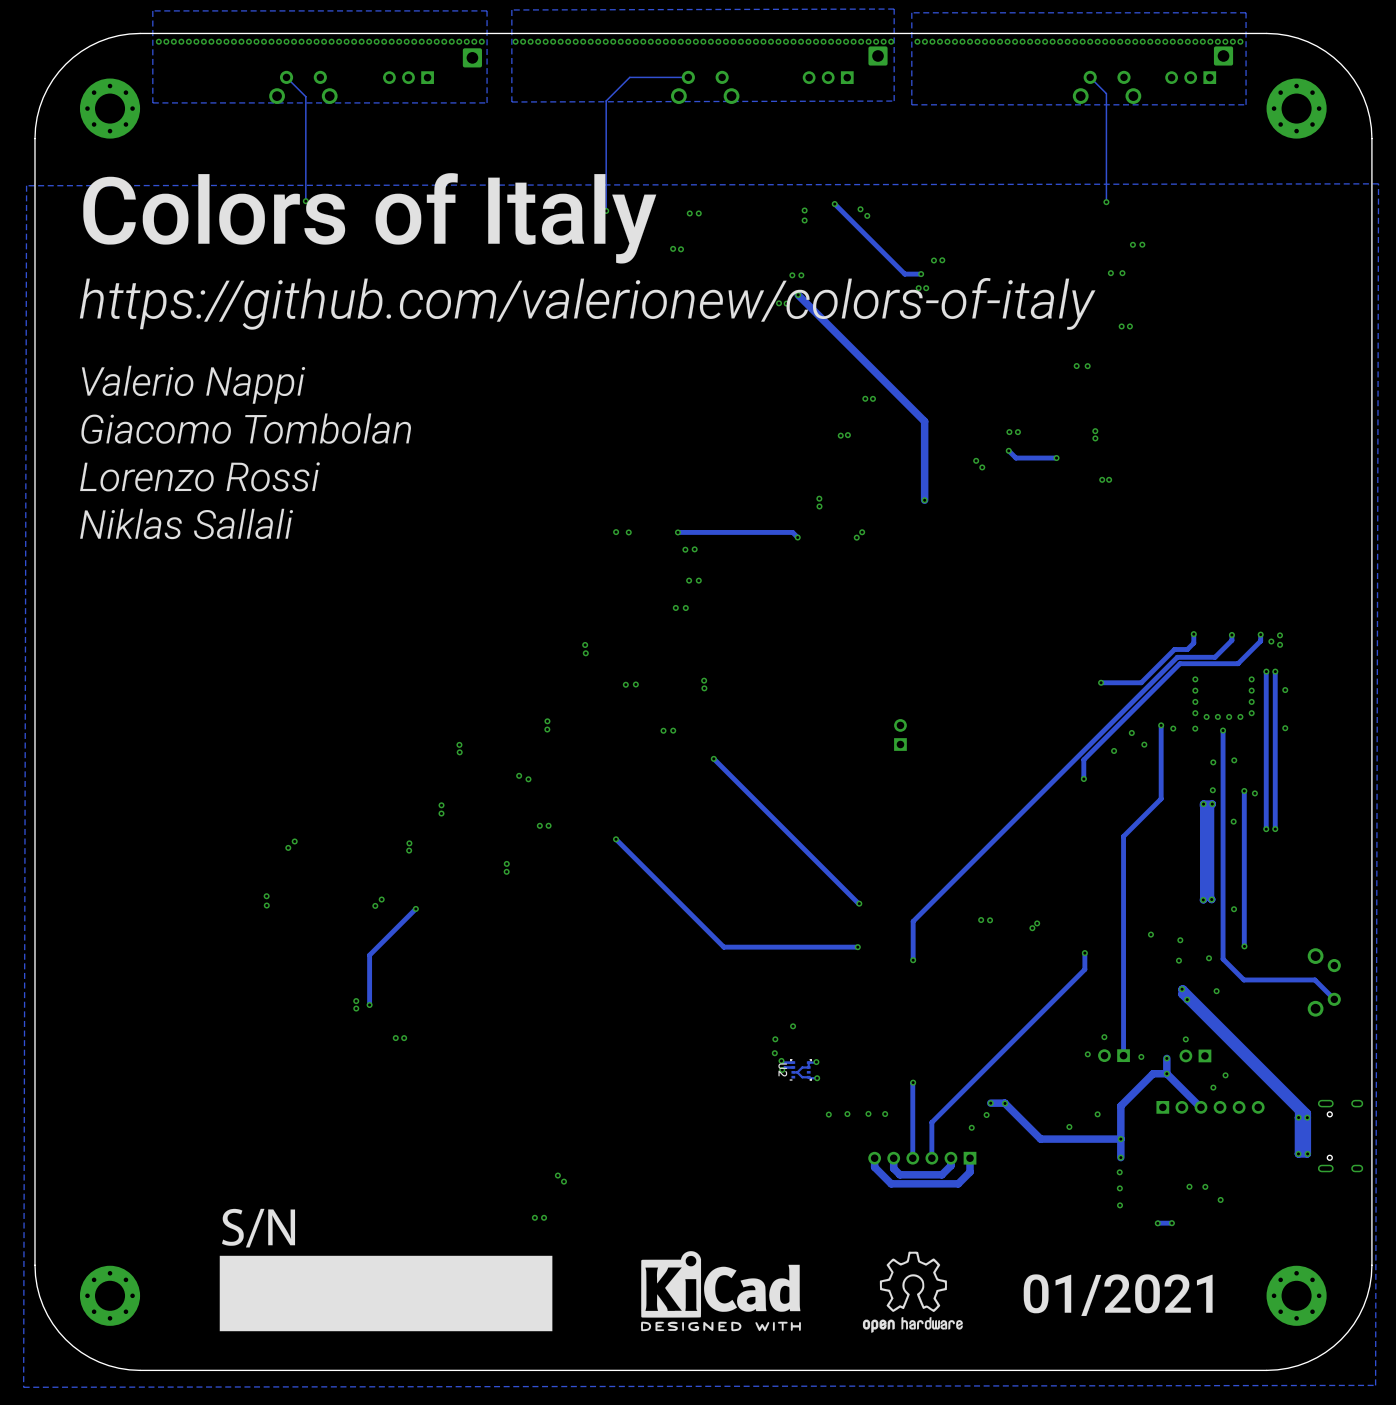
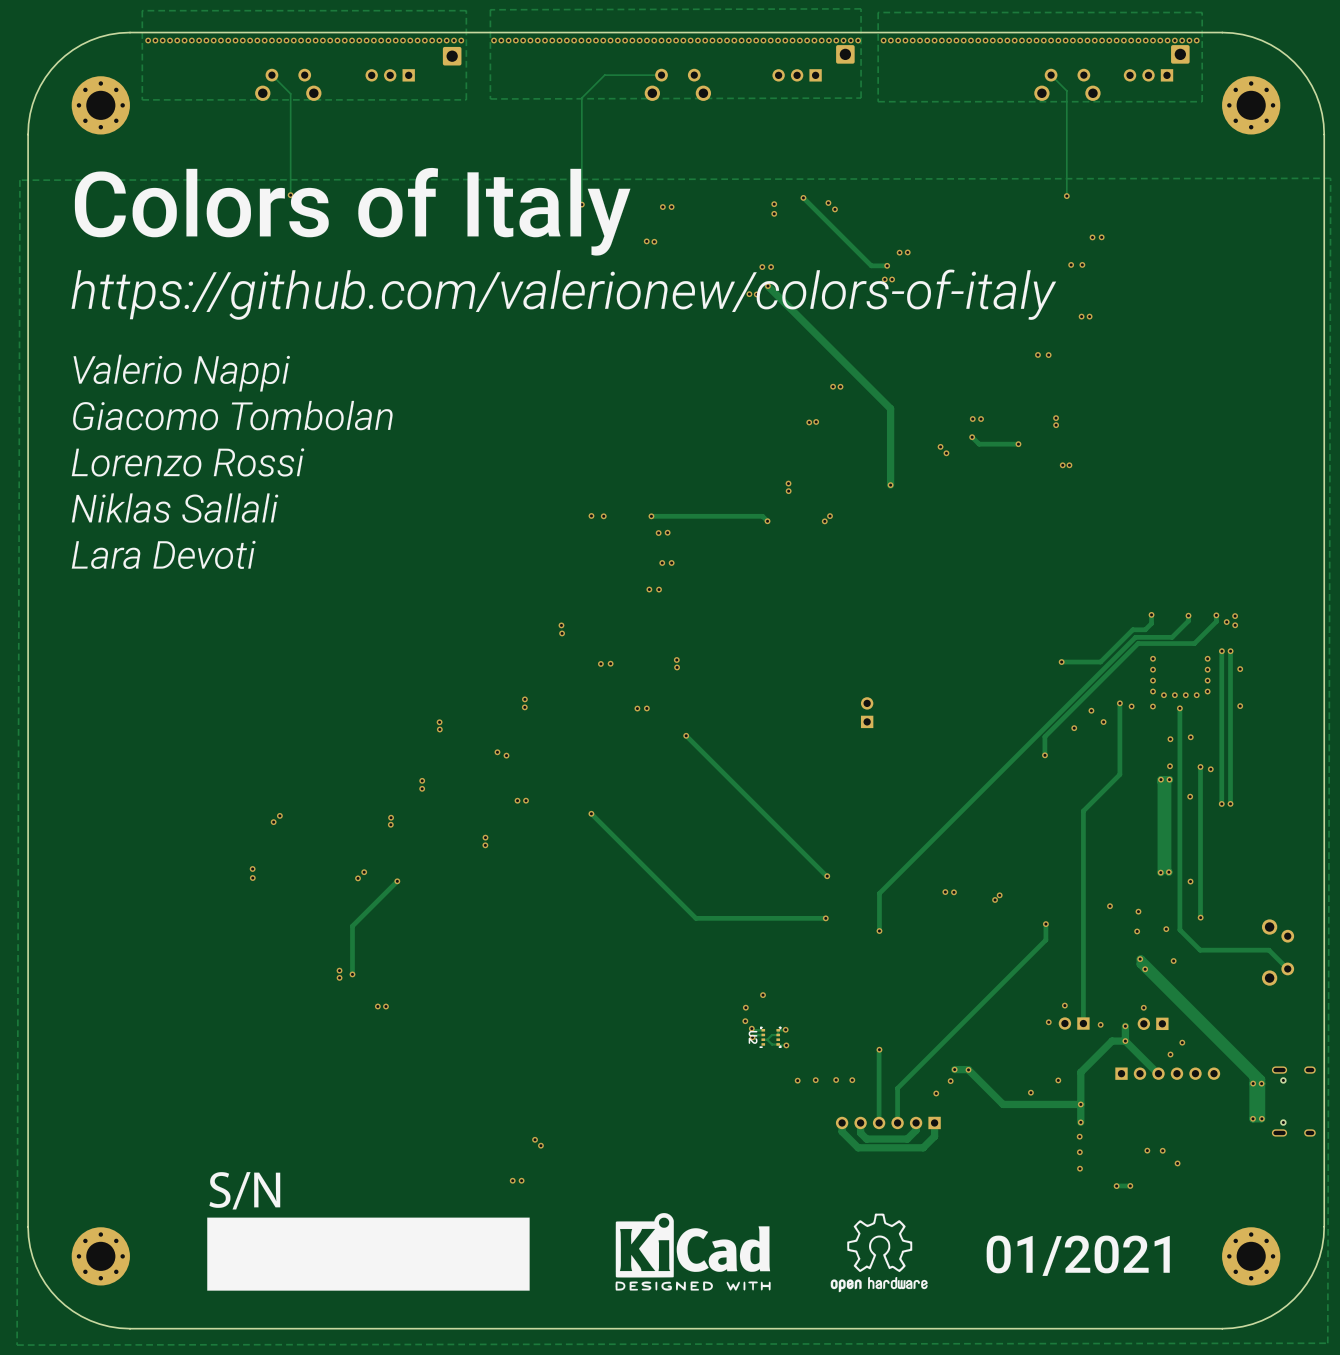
drawing shape: [79, 173, 1213, 1333] -> [71, 167, 1170, 1293]

